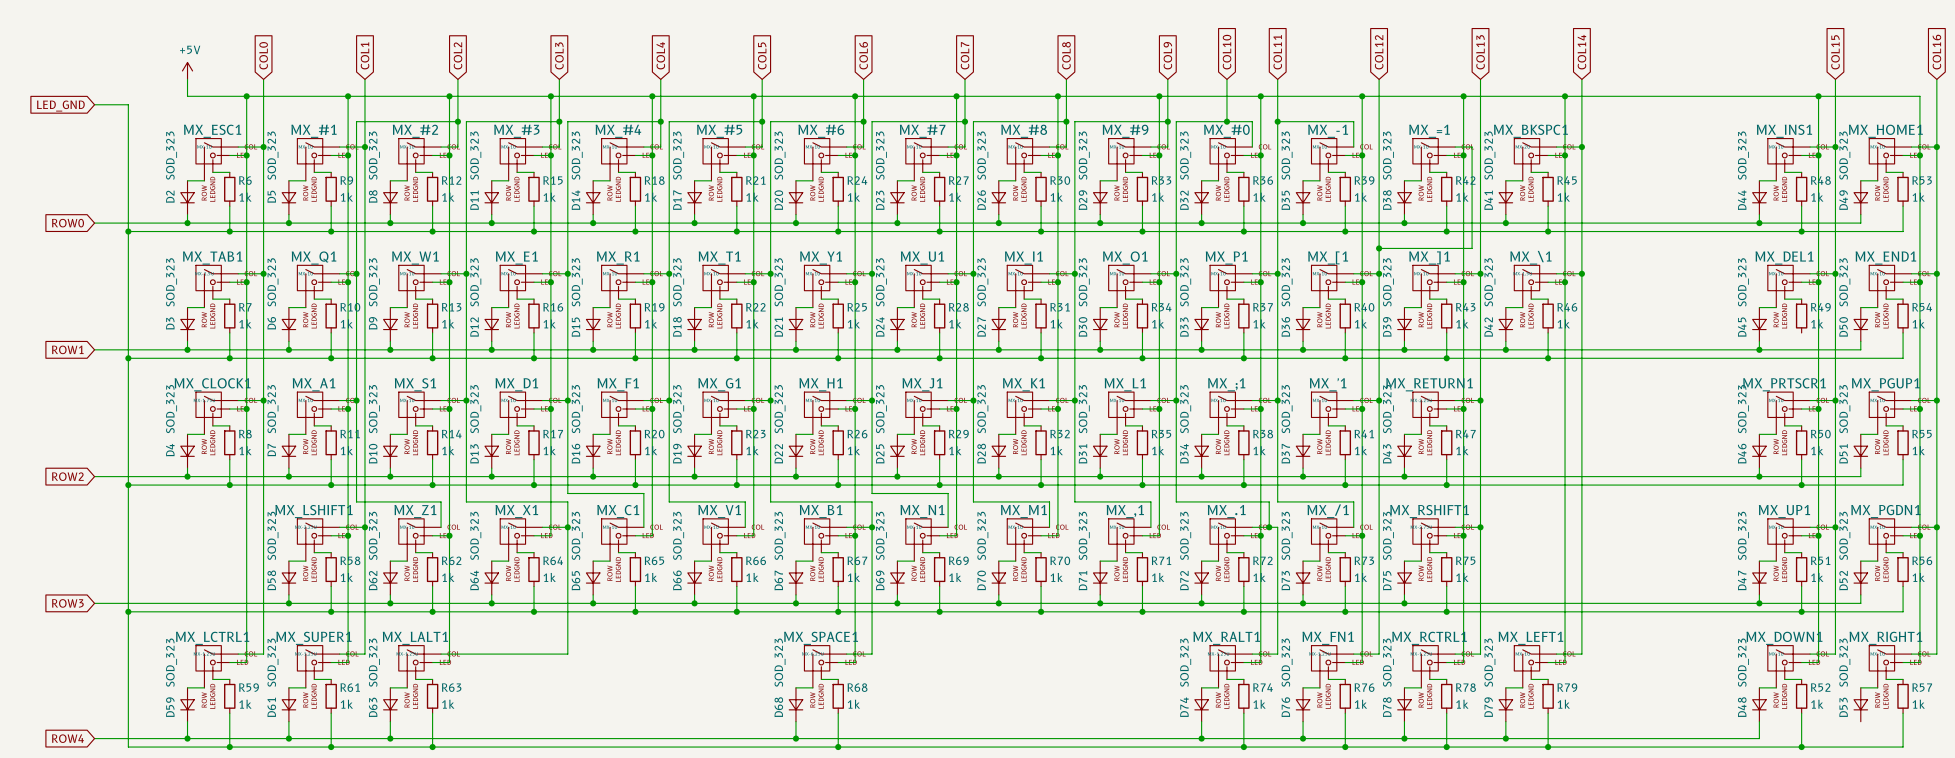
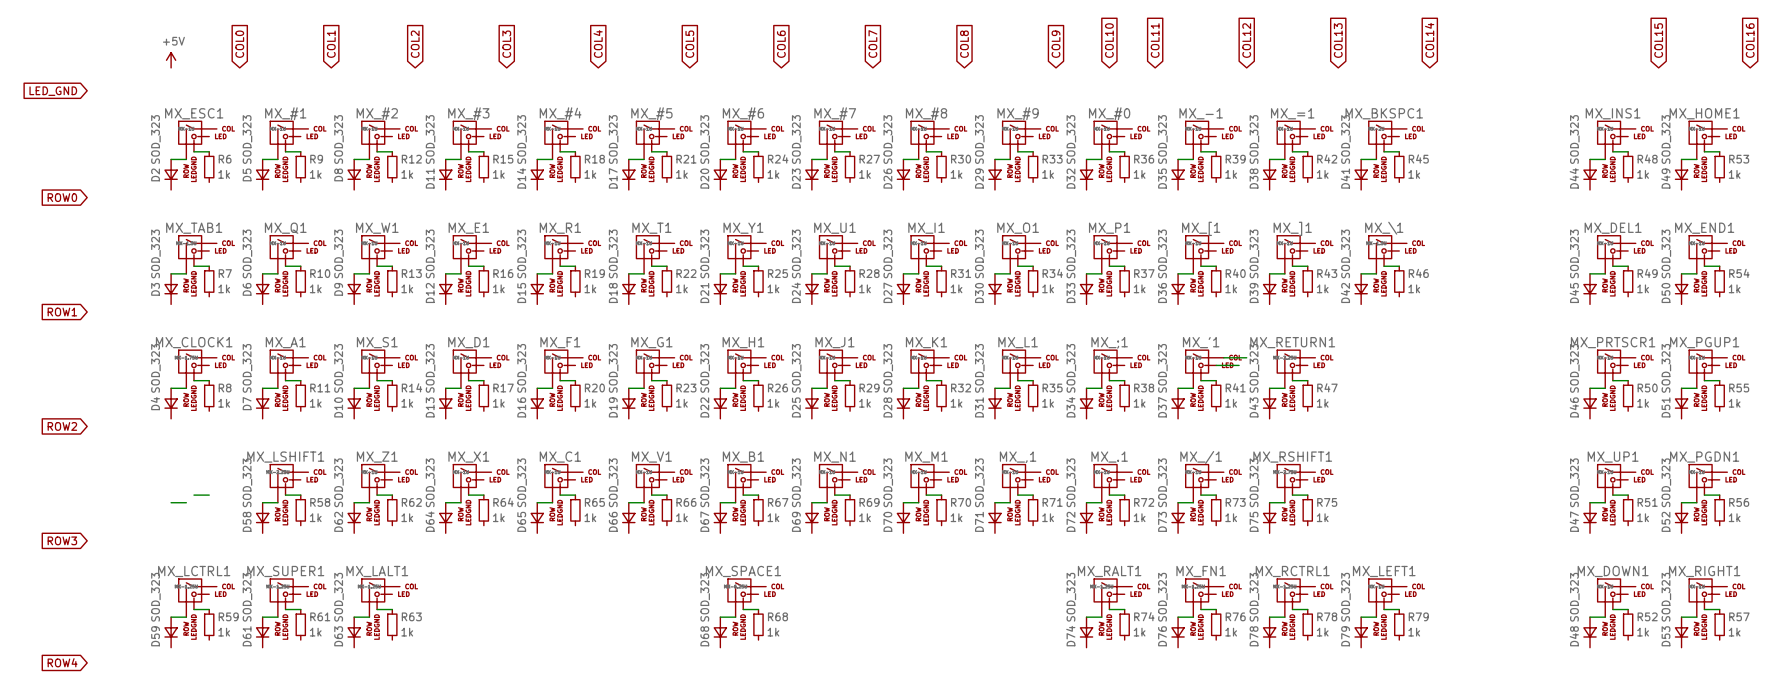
wire: (187, 79) (187, 96) (1919, 96) (1919, 662) (1903, 662) -> none
wire: (263, 79) (263, 654) (238, 654) -> none
wire: (364, 79) (364, 654) (339, 654) -> none
wire: (457, 79) (457, 147) (441, 147) -> none
wire: (559, 79) (559, 147) (542, 147) -> none
wire: (660, 79) (660, 147) (643, 147) -> none
wire: (762, 79) (762, 147) (745, 147) -> none
wire: (863, 79) (863, 147) (846, 147) -> none
wire: (965, 79) (965, 147) (948, 147) -> none
wire: (1066, 79) (1066, 147) (1049, 147) -> none
wire: (1167, 79) (1167, 147) (1150, 147) -> none
wire: (1226, 79) (1226, 121) -> none
wire: (1277, 79) (1277, 501) (1353, 501) (1353, 527) -> none
wire: (1379, 79) (1379, 654) (1353, 654) -> none
wire: (1480, 79) (1480, 654) (1455, 654) -> none
wire: (1581, 79) (1581, 654) (1556, 654) -> none
wire: (1835, 79) (1835, 654) (1810, 654) -> none
wire: (1936, 79) (1936, 654) (1911, 654) -> none
wire: (246, 96) (246, 662) (229, 662) -> none
junction: (246, 96) -> none
wire: (348, 96) (348, 662) (331, 662) -> none
junction: (348, 96) -> none
wire: (449, 96) (449, 662) (432, 662) -> none
junction: (449, 96) -> none
wire: (550, 96) (550, 535) (534, 535) -> none
junction: (550, 96) -> none
wire: (652, 96) (652, 535) (635, 535) -> none
junction: (652, 96) -> none
wire: (753, 96) (753, 535) (736, 535) -> none
junction: (753, 96) -> none
wire: (855, 96) (855, 662) (838, 662) -> none
junction: (855, 96) -> none
wire: (956, 96) (956, 535) (939, 535) -> none
junction: (956, 96) -> none
wire: (1057, 96) (1057, 535) (1041, 535) -> none
junction: (1057, 96) -> none
wire: (1159, 96) (1159, 535) (1142, 535) -> none
junction: (1159, 96) -> none
wire: (1260, 96) (1260, 662) (1243, 662) -> none
junction: (1260, 96) -> none
wire: (1362, 96) (1362, 662) (1345, 662) -> none
junction: (1362, 96) -> none
wire: (1463, 96) (1463, 662) (1446, 662) -> none
junction: (1463, 96) -> none
wire: (1565, 96) (1565, 662) (1548, 662) -> none
junction: (1565, 96) -> none
wire: (1818, 96) (1818, 662) (1801, 662) -> none
junction: (1818, 96) -> none
wire: (94, 104) (128, 104) (128, 747) (1903, 747) (1903, 713) -> none
wire: (457, 121) (356, 121) (356, 501) (441, 501) (441, 527) -> none
junction: (457, 121) -> none
wire: (559, 121) (466, 121) (466, 501) (567, 501) (567, 654) (441, 654) -> none
junction: (559, 121) -> none
wire: (660, 121) (567, 121) (567, 493) (643, 493) (643, 527) -> none
junction: (660, 121) -> none
wire: (762, 121) (669, 121) (669, 501) (745, 501) (745, 527) -> none
junction: (762, 121) -> none
wire: (863, 121) (770, 121) (770, 501) (872, 501) (872, 654) (846, 654) -> none
junction: (863, 121) -> none
wire: (965, 121) (872, 121) (872, 493) (948, 493) (948, 527) -> none
junction: (965, 121) -> none
wire: (1066, 121) (973, 121) (973, 501) (1049, 501) (1049, 527) -> none
junction: (1066, 121) -> none
wire: (1167, 121) (1074, 121) (1074, 501) (1150, 501) (1150, 527) -> none
junction: (1167, 121) -> none
junction: (1226, 121) -> none
wire: (1277, 121) (1353, 121) (1353, 147) -> none
junction: (1277, 121) -> none
wire: (238, 147) (263, 147) -> none
junction: (263, 147) -> none
wire: (339, 147) (364, 147) -> none
junction: (364, 147) -> none
wire: (1252, 147) (1252, 121) (1176, 121) (1176, 501) (1269, 501) (1269, 527) -> none
wire: (1455, 147) (1472, 147) (1472, 248) (1379, 248) -> none
wire: (1556, 147) (1581, 147) -> none
junction: (1581, 147) -> none
wire: (1810, 147) (1835, 147) -> none
junction: (1835, 147) -> none
wire: (1911, 147) (1936, 147) -> none
junction: (1936, 147) -> none
wire: (229, 155) (246, 155) -> none
junction: (246, 155) -> none
wire: (331, 155) (348, 155) -> none
junction: (348, 155) -> none
wire: (432, 155) (449, 155) -> none
junction: (449, 155) -> none
wire: (534, 155) (550, 155) -> none
junction: (550, 155) -> none
wire: (635, 155) (652, 155) -> none
junction: (652, 155) -> none
wire: (736, 155) (753, 155) -> none
junction: (753, 155) -> none
wire: (838, 155) (855, 155) -> none
junction: (855, 155) -> none
wire: (939, 155) (956, 155) -> none
junction: (956, 155) -> none
wire: (1041, 155) (1057, 155) -> none
junction: (1057, 155) -> none
wire: (1142, 155) (1159, 155) -> none
junction: (1159, 155) -> none
wire: (1243, 155) (1260, 155) -> none
junction: (1260, 155) -> none
wire: (1345, 155) (1362, 155) -> none
junction: (1362, 155) -> none
wire: (1446, 155) (1463, 155) -> none
junction: (1463, 155) -> none
wire: (1548, 155) (1565, 155) -> none
junction: (1565, 155) -> none
wire: (1801, 155) (1818, 155) -> none
junction: (1818, 155) -> none
wire: (1903, 155) (1919, 155) -> none
junction: (1919, 155) -> none
wire: (229, 206) (229, 231) -> none
wire: (331, 206) (331, 231) -> none
wire: (432, 206) (432, 231) -> none
wire: (534, 206) (534, 231) -> none
wire: (635, 206) (635, 231) -> none
wire: (736, 206) (736, 231) -> none
wire: (838, 206) (838, 231) -> none
wire: (939, 206) (939, 231) -> none
wire: (1041, 206) (1041, 231) -> none
wire: (1142, 206) (1142, 231) -> none
wire: (1243, 206) (1243, 231) -> none
wire: (1345, 206) (1345, 231) -> none
wire: (1446, 206) (1446, 231) -> none
wire: (1548, 206) (1548, 231) -> none
wire: (1801, 206) (1801, 231) -> none
wire: (1903, 206) (1903, 231) (128, 231) -> none
wire: (187, 214) (187, 223) -> none
wire: (288, 214) (288, 223) -> none
wire: (390, 214) (390, 223) -> none
wire: (491, 214) (491, 223) -> none
wire: (593, 214) (593, 223) -> none
wire: (694, 214) (694, 223) -> none
wire: (795, 214) (795, 223) -> none
wire: (897, 214) (897, 223) -> none
wire: (998, 214) (998, 223) -> none
wire: (1100, 214) (1100, 223) -> none
wire: (1201, 214) (1201, 223) -> none
wire: (1303, 214) (1303, 223) -> none
wire: (1404, 214) (1404, 223) -> none
wire: (1505, 214) (1505, 223) -> none
wire: (1759, 214) (1759, 223) -> none
wire: (1860, 214) (1860, 223) (94, 223) -> none
junction: (187, 223) -> none
junction: (288, 223) -> none
junction: (390, 223) -> none
junction: (491, 223) -> none
junction: (593, 223) -> none
junction: (694, 223) -> none
junction: (795, 223) -> none
junction: (897, 223) -> none
junction: (998, 223) -> none
junction: (1100, 223) -> none
junction: (1201, 223) -> none
junction: (1303, 223) -> none
junction: (1404, 223) -> none
junction: (1505, 223) -> none
junction: (1759, 223) -> none
junction: (128, 231) -> none
junction: (229, 231) -> none
junction: (331, 231) -> none
junction: (432, 231) -> none
junction: (534, 231) -> none
junction: (635, 231) -> none
junction: (736, 231) -> none
junction: (838, 231) -> none
junction: (939, 231) -> none
junction: (1041, 231) -> none
junction: (1142, 231) -> none
junction: (1243, 231) -> none
junction: (1345, 231) -> none
junction: (1446, 231) -> none
junction: (1548, 231) -> none
junction: (1801, 231) -> none
junction: (1379, 248) -> none
wire: (238, 273) (263, 273) -> none
junction: (263, 273) -> none
wire: (339, 273) (356, 273) -> none
junction: (356, 273) -> none
wire: (441, 273) (466, 273) -> none
junction: (466, 273) -> none
wire: (542, 273) (567, 273) -> none
junction: (567, 273) -> none
wire: (643, 273) (669, 273) -> none
junction: (669, 273) -> none
wire: (745, 273) (770, 273) -> none
junction: (770, 273) -> none
wire: (846, 273) (872, 273) -> none
junction: (872, 273) -> none
wire: (948, 273) (973, 273) -> none
junction: (973, 273) -> none
wire: (1049, 273) (1074, 273) -> none
junction: (1074, 273) -> none
wire: (1150, 273) (1176, 273) -> none
junction: (1176, 273) -> none
wire: (1252, 273) (1277, 273) -> none
junction: (1277, 273) -> none
wire: (1353, 273) (1379, 273) -> none
junction: (1379, 273) -> none
wire: (1455, 273) (1480, 273) -> none
junction: (1480, 273) -> none
wire: (1556, 273) (1581, 273) -> none
junction: (1581, 273) -> none
wire: (1810, 273) (1835, 273) -> none
junction: (1835, 273) -> none
wire: (1911, 273) (1936, 273) -> none
junction: (1936, 273) -> none
wire: (229, 282) (246, 282) -> none
junction: (246, 282) -> none
wire: (331, 282) (348, 282) -> none
junction: (348, 282) -> none
wire: (432, 282) (449, 282) -> none
junction: (449, 282) -> none
wire: (534, 282) (550, 282) -> none
junction: (550, 282) -> none
wire: (635, 282) (652, 282) -> none
junction: (652, 282) -> none
wire: (736, 282) (753, 282) -> none
junction: (753, 282) -> none
wire: (838, 282) (855, 282) -> none
junction: (855, 282) -> none
wire: (939, 282) (956, 282) -> none
junction: (956, 282) -> none
wire: (1041, 282) (1057, 282) -> none
junction: (1057, 282) -> none
wire: (1142, 282) (1159, 282) -> none
junction: (1159, 282) -> none
wire: (1243, 282) (1260, 282) -> none
junction: (1260, 282) -> none
wire: (1345, 282) (1362, 282) -> none
junction: (1362, 282) -> none
wire: (1446, 282) (1463, 282) -> none
junction: (1463, 282) -> none
wire: (1548, 282) (1565, 282) -> none
junction: (1565, 282) -> none
wire: (1801, 282) (1818, 282) -> none
junction: (1818, 282) -> none
wire: (1903, 282) (1919, 282) -> none
junction: (1919, 282) -> none
wire: (229, 332) (229, 358) -> none
wire: (331, 332) (331, 358) -> none
wire: (432, 332) (432, 358) -> none
wire: (534, 332) (534, 358) -> none
wire: (635, 332) (635, 358) -> none
wire: (736, 332) (736, 358) -> none
wire: (838, 332) (838, 358) -> none
wire: (939, 332) (939, 358) -> none
wire: (1041, 332) (1041, 358) -> none
wire: (1142, 332) (1142, 358) -> none
wire: (1243, 332) (1243, 358) -> none
wire: (1345, 332) (1345, 358) -> none
wire: (1446, 332) (1446, 358) -> none
wire: (1548, 332) (1548, 358) -> none
wire: (1903, 332) (1903, 358) (128, 358) -> none
wire: (187, 341) (187, 349) -> none
wire: (288, 341) (288, 349) -> none
wire: (390, 341) (390, 349) -> none
wire: (491, 341) (491, 349) -> none
wire: (593, 341) (593, 349) -> none
wire: (694, 341) (694, 349) -> none
wire: (795, 341) (795, 349) -> none
wire: (897, 341) (897, 349) -> none
wire: (998, 341) (998, 349) -> none
wire: (1100, 341) (1100, 349) -> none
wire: (1201, 341) (1201, 349) -> none
wire: (1303, 341) (1303, 349) -> none
wire: (1404, 341) (1404, 349) -> none
wire: (1505, 341) (1505, 349) -> none
wire: (1759, 341) (1759, 349) -> none
wire: (1860, 341) (1860, 349) (94, 349) -> none
junction: (187, 349) -> none
junction: (288, 349) -> none
junction: (390, 349) -> none
junction: (491, 349) -> none
junction: (593, 349) -> none
junction: (694, 349) -> none
junction: (795, 349) -> none
junction: (897, 349) -> none
junction: (998, 349) -> none
junction: (1100, 349) -> none
junction: (1201, 349) -> none
junction: (1303, 349) -> none
junction: (1404, 349) -> none
junction: (1505, 349) -> none
junction: (1759, 349) -> none
junction: (128, 358) -> none
junction: (229, 358) -> none
junction: (331, 358) -> none
junction: (432, 358) -> none
junction: (534, 358) -> none
junction: (635, 358) -> none
junction: (736, 358) -> none
junction: (838, 358) -> none
junction: (939, 358) -> none
junction: (1041, 358) -> none
junction: (1142, 358) -> none
junction: (1243, 358) -> none
junction: (1345, 358) -> none
junction: (1446, 358) -> none
junction: (1548, 358) -> none
wire: (238, 400) (263, 400) -> none
junction: (263, 400) -> none
wire: (339, 400) (356, 400) -> none
junction: (356, 400) -> none
wire: (441, 400) (466, 400) -> none
junction: (466, 400) -> none
wire: (542, 400) (567, 400) -> none
junction: (567, 400) -> none
wire: (643, 400) (669, 400) -> none
junction: (669, 400) -> none
wire: (745, 400) (770, 400) -> none
junction: (770, 400) -> none
wire: (846, 400) (872, 400) -> none
junction: (872, 400) -> none
wire: (948, 400) (973, 400) -> none
junction: (973, 400) -> none
wire: (1049, 400) (1074, 400) -> none
junction: (1074, 400) -> none
wire: (1150, 400) (1176, 400) -> none
junction: (1176, 400) -> none
wire: (1252, 400) (1277, 400) -> none
junction: (1277, 400) -> none
junction: (1379, 400) -> none
wire: (1455, 400) (1480, 400) -> none
junction: (1480, 400) -> none
wire: (1810, 400) (1835, 400) -> none
junction: (1835, 400) -> none
wire: (1911, 400) (1936, 400) -> none
junction: (1936, 400) -> none
wire: (229, 409) (246, 409) -> (171, 502) (186, 502)
junction: (246, 409) -> none
wire: (331, 409) (348, 409) -> none
junction: (348, 409) -> none
wire: (432, 409) (449, 409) -> none
junction: (449, 409) -> none
wire: (534, 409) (550, 409) -> none
junction: (550, 409) -> none
wire: (635, 409) (652, 409) -> none
junction: (652, 409) -> none
wire: (736, 409) (753, 409) -> none
junction: (753, 409) -> none
wire: (838, 409) (855, 409) -> none
junction: (855, 409) -> none
wire: (939, 409) (956, 409) -> none
junction: (956, 409) -> none
wire: (1041, 409) (1057, 409) -> none
junction: (1057, 409) -> none
wire: (1142, 409) (1159, 409) -> none
junction: (1159, 409) -> none
wire: (1243, 409) (1260, 409) -> none
junction: (1260, 409) -> none
wire: none -> (1231, 365) (1239, 365)
junction: (1362, 409) -> none
wire: (1446, 409) (1463, 409) -> none
junction: (1463, 409) -> none
wire: (1801, 409) (1818, 409) -> none
junction: (1818, 409) -> none
wire: (1903, 409) (1919, 409) -> none
junction: (1919, 409) -> none
wire: (229, 459) (229, 485) -> none
wire: (331, 459) (331, 485) -> none
wire: (432, 459) (432, 485) -> none
wire: (534, 459) (534, 485) -> none
wire: (635, 459) (635, 485) -> none
wire: (736, 459) (736, 485) -> none
wire: (838, 459) (838, 485) -> none
wire: (939, 459) (939, 485) -> none
wire: (1041, 459) (1041, 485) -> none
wire: (1142, 459) (1142, 485) -> none
wire: (1243, 459) (1243, 485) -> none
wire: (1345, 459) (1345, 485) -> none
wire: (1446, 459) (1446, 485) -> none
wire: (1801, 459) (1801, 485) -> none
wire: (1903, 459) (1903, 485) (128, 485) -> none
wire: (187, 468) (187, 476) -> none
wire: (288, 468) (288, 476) -> none
wire: (390, 468) (390, 476) -> none
wire: (491, 468) (491, 476) -> none
wire: (593, 468) (593, 476) -> none
wire: (694, 468) (694, 476) -> none
wire: (795, 468) (795, 476) -> none
wire: (897, 468) (897, 476) -> none
wire: (998, 468) (998, 476) -> none
wire: (1100, 468) (1100, 476) -> none
wire: (1201, 468) (1201, 476) -> none
wire: (1303, 468) (1303, 476) -> none
wire: (1404, 468) (1404, 476) -> none
wire: (1759, 468) (1759, 476) -> none
wire: (1860, 468) (1860, 476) (94, 476) -> none
junction: (187, 476) -> none
junction: (288, 476) -> none
junction: (390, 476) -> none
junction: (491, 476) -> none
junction: (593, 476) -> none
junction: (694, 476) -> none
junction: (795, 476) -> none
junction: (897, 476) -> none
junction: (998, 476) -> none
junction: (1100, 476) -> none
junction: (1201, 476) -> none
junction: (1303, 476) -> none
junction: (1404, 476) -> none
junction: (1759, 476) -> none
junction: (128, 485) -> none
junction: (229, 485) -> none
junction: (331, 485) -> none
junction: (432, 485) -> none
junction: (534, 485) -> none
junction: (635, 485) -> none
junction: (736, 485) -> none
junction: (838, 485) -> none
junction: (939, 485) -> none
junction: (1041, 485) -> none
junction: (1142, 485) -> none
junction: (1243, 485) -> none
junction: (1345, 485) -> none
junction: (1446, 485) -> none
junction: (1801, 485) -> none
wire: (339, 527) (364, 527) -> none
junction: (364, 527) -> none
wire: (542, 527) (567, 527) -> none
junction: (567, 527) -> none
wire: (846, 527) (872, 527) -> none
junction: (872, 527) -> none
wire: (1252, 527) (1277, 527) (1277, 654) (1252, 654) -> none
junction: (1269, 527) -> none
wire: (1455, 527) (1480, 527) -> none
junction: (1480, 527) -> none
wire: (1810, 527) (1835, 527) -> none
junction: (1835, 527) -> none
wire: (1911, 527) (1936, 527) -> none
junction: (1936, 527) -> none
wire: (331, 535) (348, 535) -> (193, 495) (209, 495)
junction: (348, 535) -> none
wire: (432, 535) (449, 535) -> none
junction: (449, 535) -> none
wire: (838, 535) (855, 535) -> none
junction: (855, 535) -> none
wire: (1243, 535) (1260, 535) -> none
junction: (1260, 535) -> none
wire: (1345, 535) (1362, 535) -> none
junction: (1362, 535) -> none
wire: (1446, 535) (1463, 535) -> none
junction: (1463, 535) -> none
wire: (1801, 535) (1818, 535) -> none
junction: (1818, 535) -> none
wire: (1903, 535) (1919, 535) -> none
junction: (1919, 535) -> none
wire: (331, 586) (331, 611) -> none
wire: (432, 586) (432, 611) -> none
wire: (534, 586) (534, 611) -> none
wire: (635, 586) (635, 611) -> none
wire: (736, 586) (736, 611) -> none
wire: (838, 586) (838, 611) -> none
wire: (939, 586) (939, 611) -> none
wire: (1041, 586) (1041, 611) -> none
wire: (1142, 586) (1142, 611) -> none
wire: (1243, 586) (1243, 611) -> none
wire: (1345, 586) (1345, 611) -> none
wire: (1446, 586) (1446, 611) -> none
wire: (1801, 586) (1801, 611) -> none
wire: (1903, 586) (1903, 611) (128, 611) -> none
wire: (288, 594) (288, 603) -> none
wire: (390, 594) (390, 603) -> none
wire: (491, 594) (491, 603) -> none
wire: (593, 594) (593, 603) -> none
wire: (694, 594) (694, 603) -> none
wire: (795, 594) (795, 603) -> none
wire: (897, 594) (897, 603) -> none
wire: (998, 594) (998, 603) -> none
wire: (1100, 594) (1100, 603) -> none
wire: (1201, 594) (1201, 603) -> none
wire: (1303, 594) (1303, 603) -> none
wire: (1404, 594) (1404, 603) -> none
wire: (1759, 594) (1759, 603) -> none
wire: (1860, 594) (1860, 603) (94, 603) -> none
junction: (288, 603) -> none
junction: (390, 603) -> none
junction: (491, 603) -> none
junction: (593, 603) -> none
junction: (694, 603) -> none
junction: (795, 603) -> none
junction: (897, 603) -> none
junction: (998, 603) -> none
junction: (1100, 603) -> none
junction: (1201, 603) -> none
junction: (1303, 603) -> none
junction: (1404, 603) -> none
junction: (1759, 603) -> none
junction: (128, 611) -> none
junction: (331, 611) -> none
junction: (432, 611) -> none
junction: (534, 611) -> none
junction: (635, 611) -> none
junction: (736, 611) -> none
junction: (838, 611) -> none
junction: (939, 611) -> none
junction: (1041, 611) -> none
junction: (1142, 611) -> none
junction: (1243, 611) -> none
junction: (1345, 611) -> none
junction: (1446, 611) -> none
junction: (1801, 611) -> none
wire: (229, 713) (229, 747) -> none
wire: (331, 713) (331, 747) -> none
wire: (432, 713) (432, 747) -> none
wire: (838, 713) (838, 747) -> none
wire: (1243, 713) (1243, 747) -> none
wire: (1345, 713) (1345, 747) -> none
wire: (1446, 713) (1446, 747) -> none
wire: (1548, 713) (1548, 747) -> none
wire: (1801, 713) (1801, 747) -> none
wire: (187, 721) (187, 738) -> none
wire: (288, 721) (288, 738) -> none
wire: (390, 721) (390, 738) -> none
wire: (795, 721) (795, 738) -> none
wire: (1201, 721) (1201, 738) -> none
wire: (1303, 721) (1303, 738) -> none
wire: (1404, 721) (1404, 738) -> none
wire: (1505, 721) (1505, 738) -> none
wire: (1759, 721) (1759, 738) (94, 738) -> none
junction: (187, 738) -> none
junction: (288, 738) -> none
junction: (390, 738) -> none
junction: (795, 738) -> none
junction: (1201, 738) -> none
junction: (1303, 738) -> none
junction: (1404, 738) -> none
junction: (1505, 738) -> none
junction: (229, 747) -> none
junction: (331, 747) -> none
junction: (432, 747) -> none
junction: (838, 747) -> none
junction: (1243, 747) -> none
junction: (1345, 747) -> none
junction: (1446, 747) -> none
junction: (1548, 747) -> none
junction: (1801, 747) -> none

